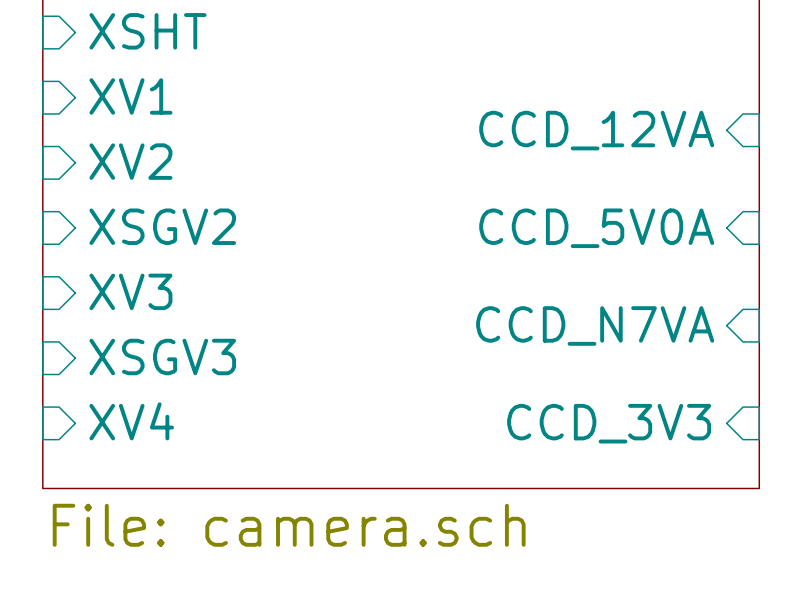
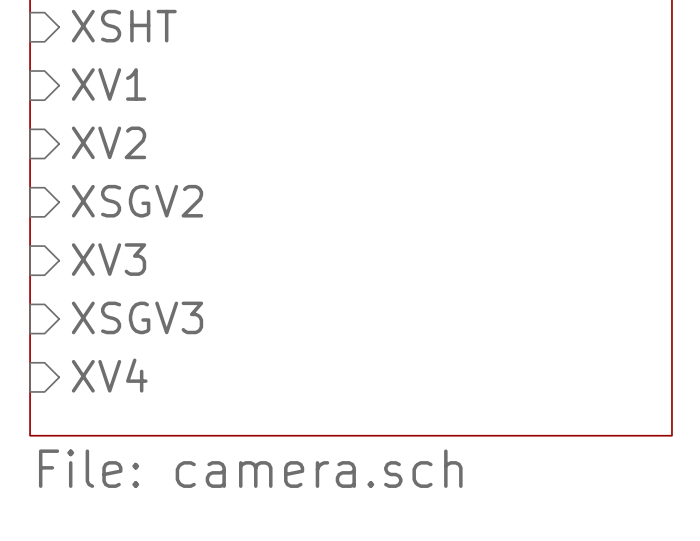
sheet pin: CCD_12VA (596, 130) -> none
sheet pin: CCD_5V0A (596, 228) -> none
sheet pin: CCD_N7VA (595, 325) -> none
sheet pin: CCD_3V3 (609, 423) -> none

